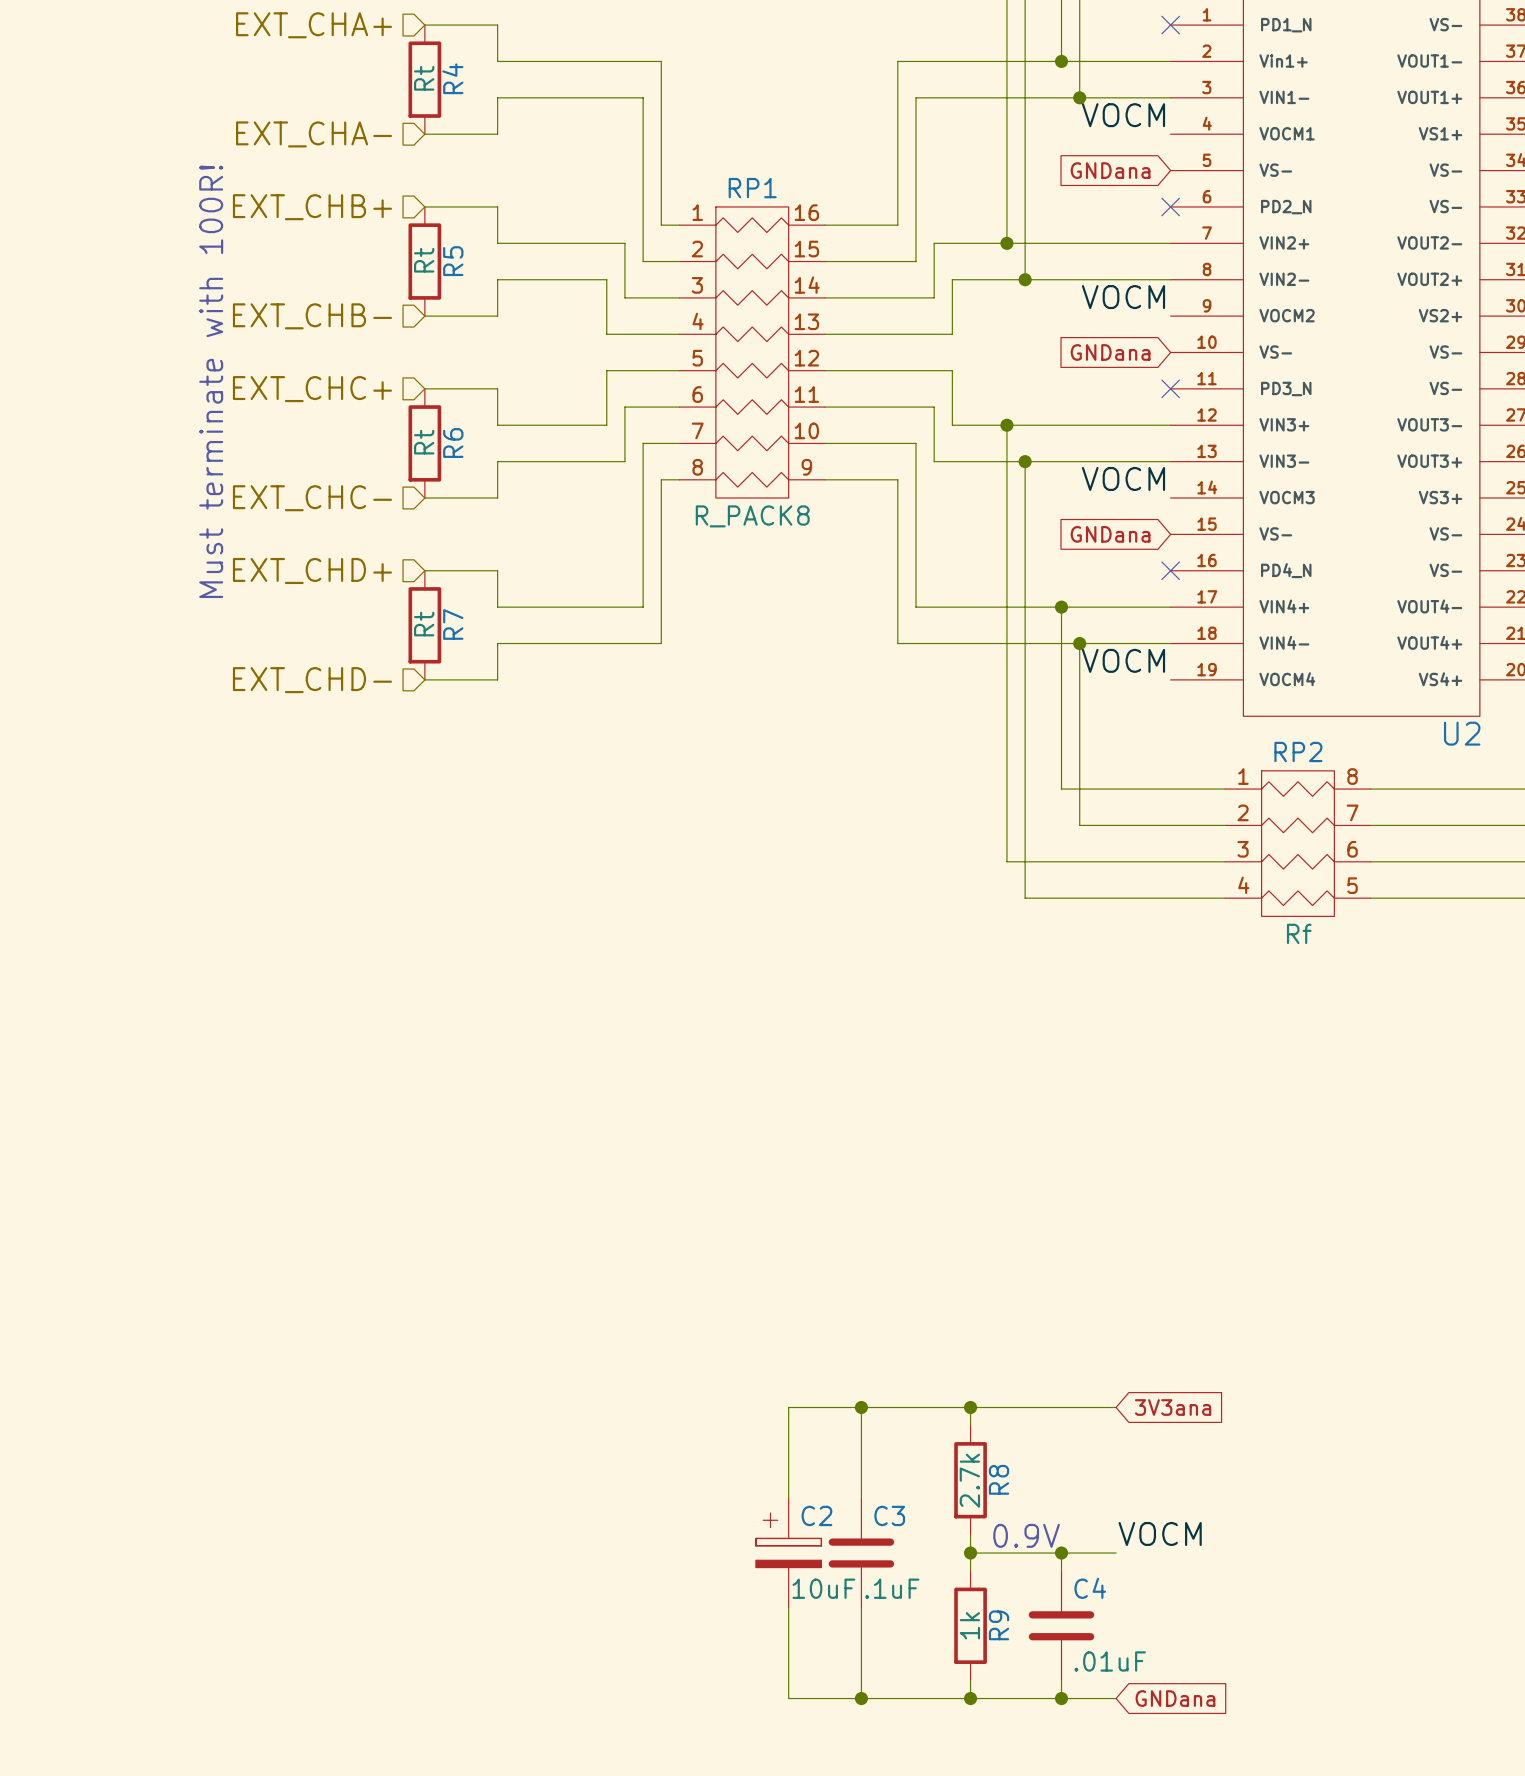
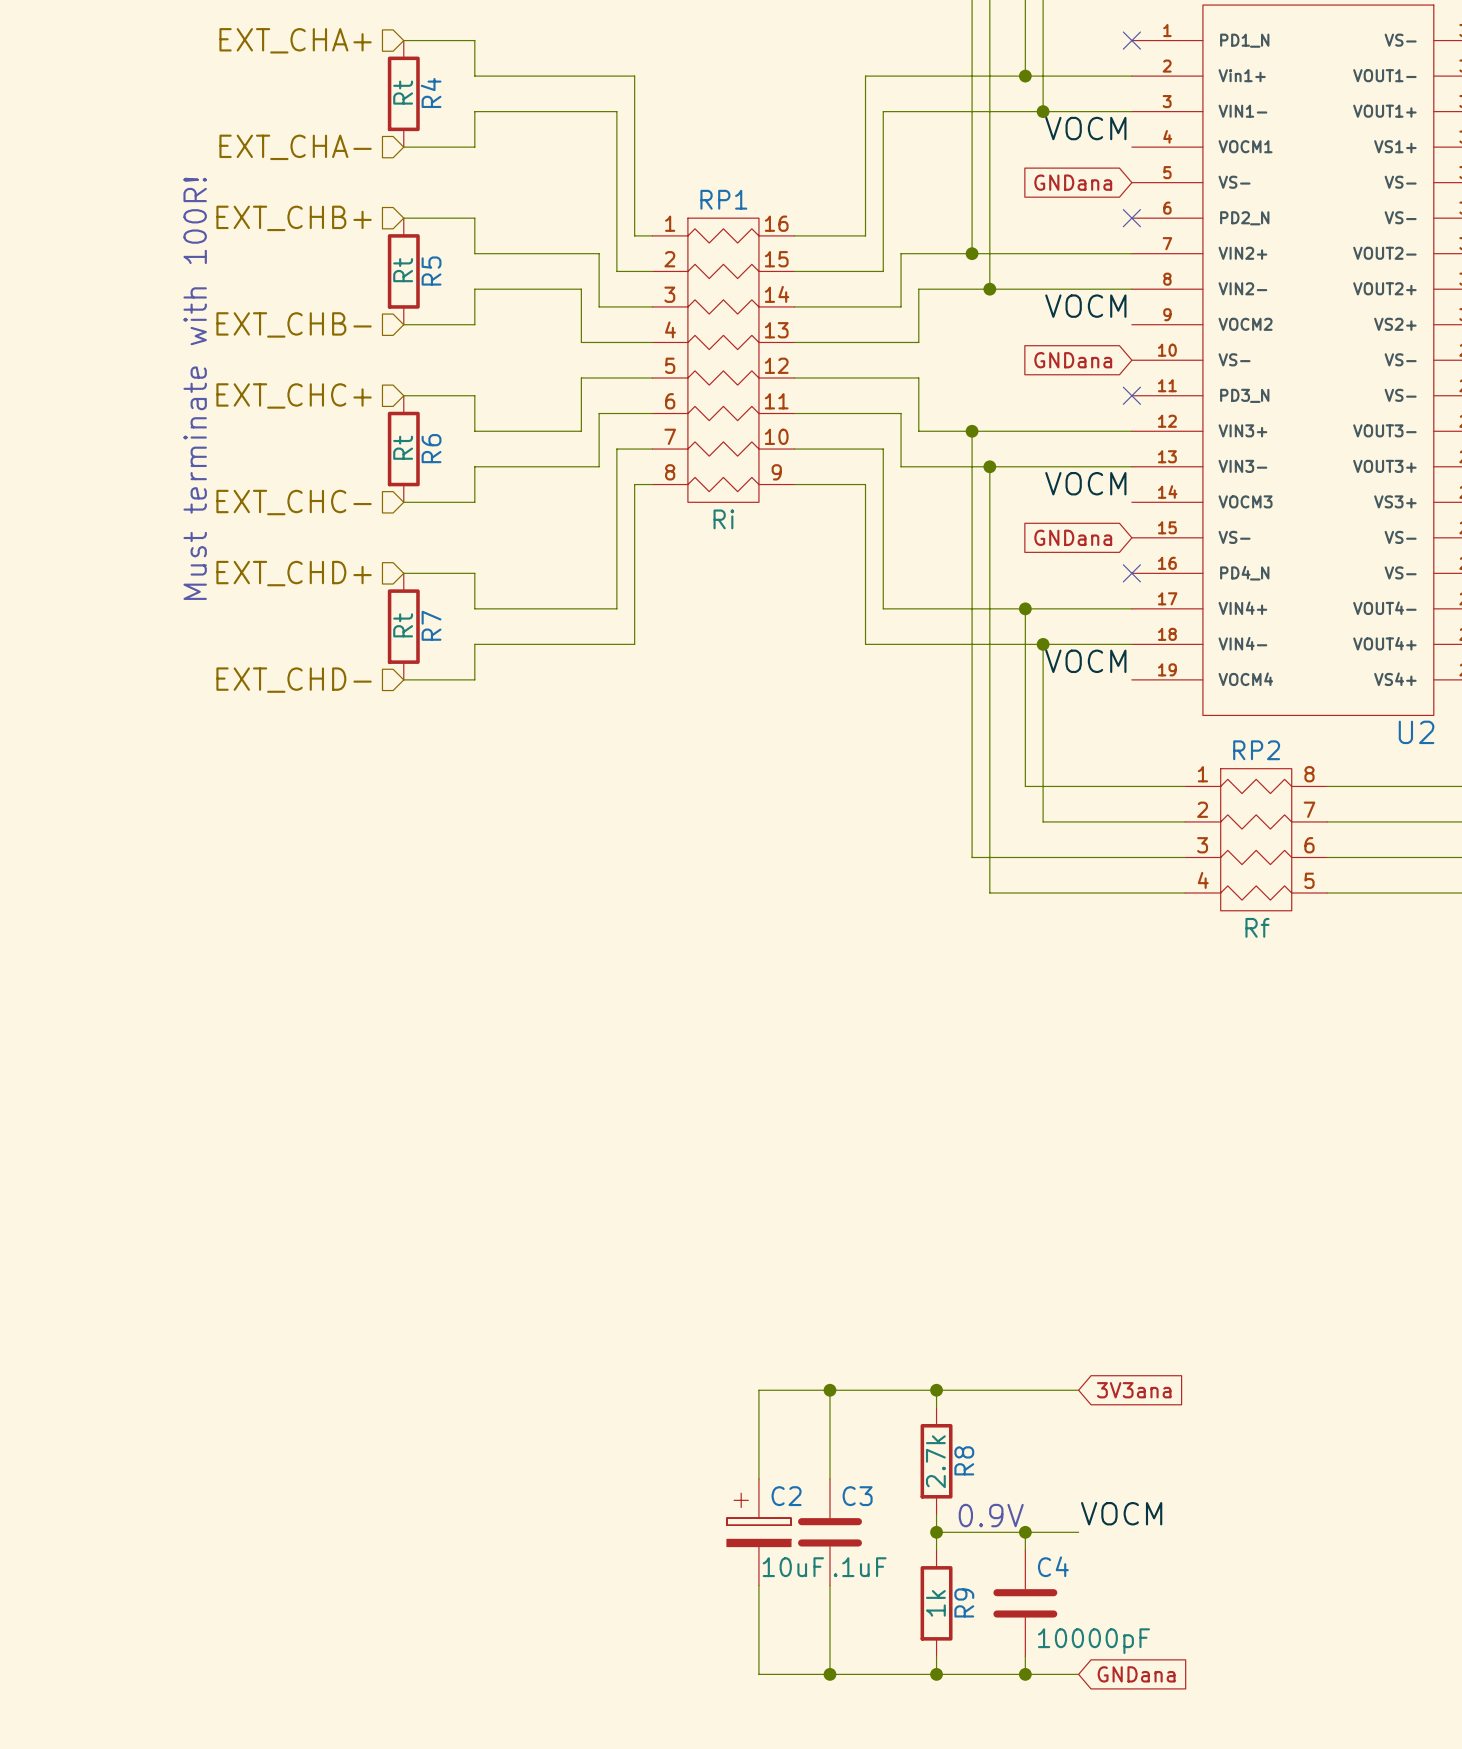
RP1 value: R_PACK8 (752, 516) -> Ri (723, 519)
C4 value: .01uF (1110, 1661) -> 10000pF (1093, 1641)

